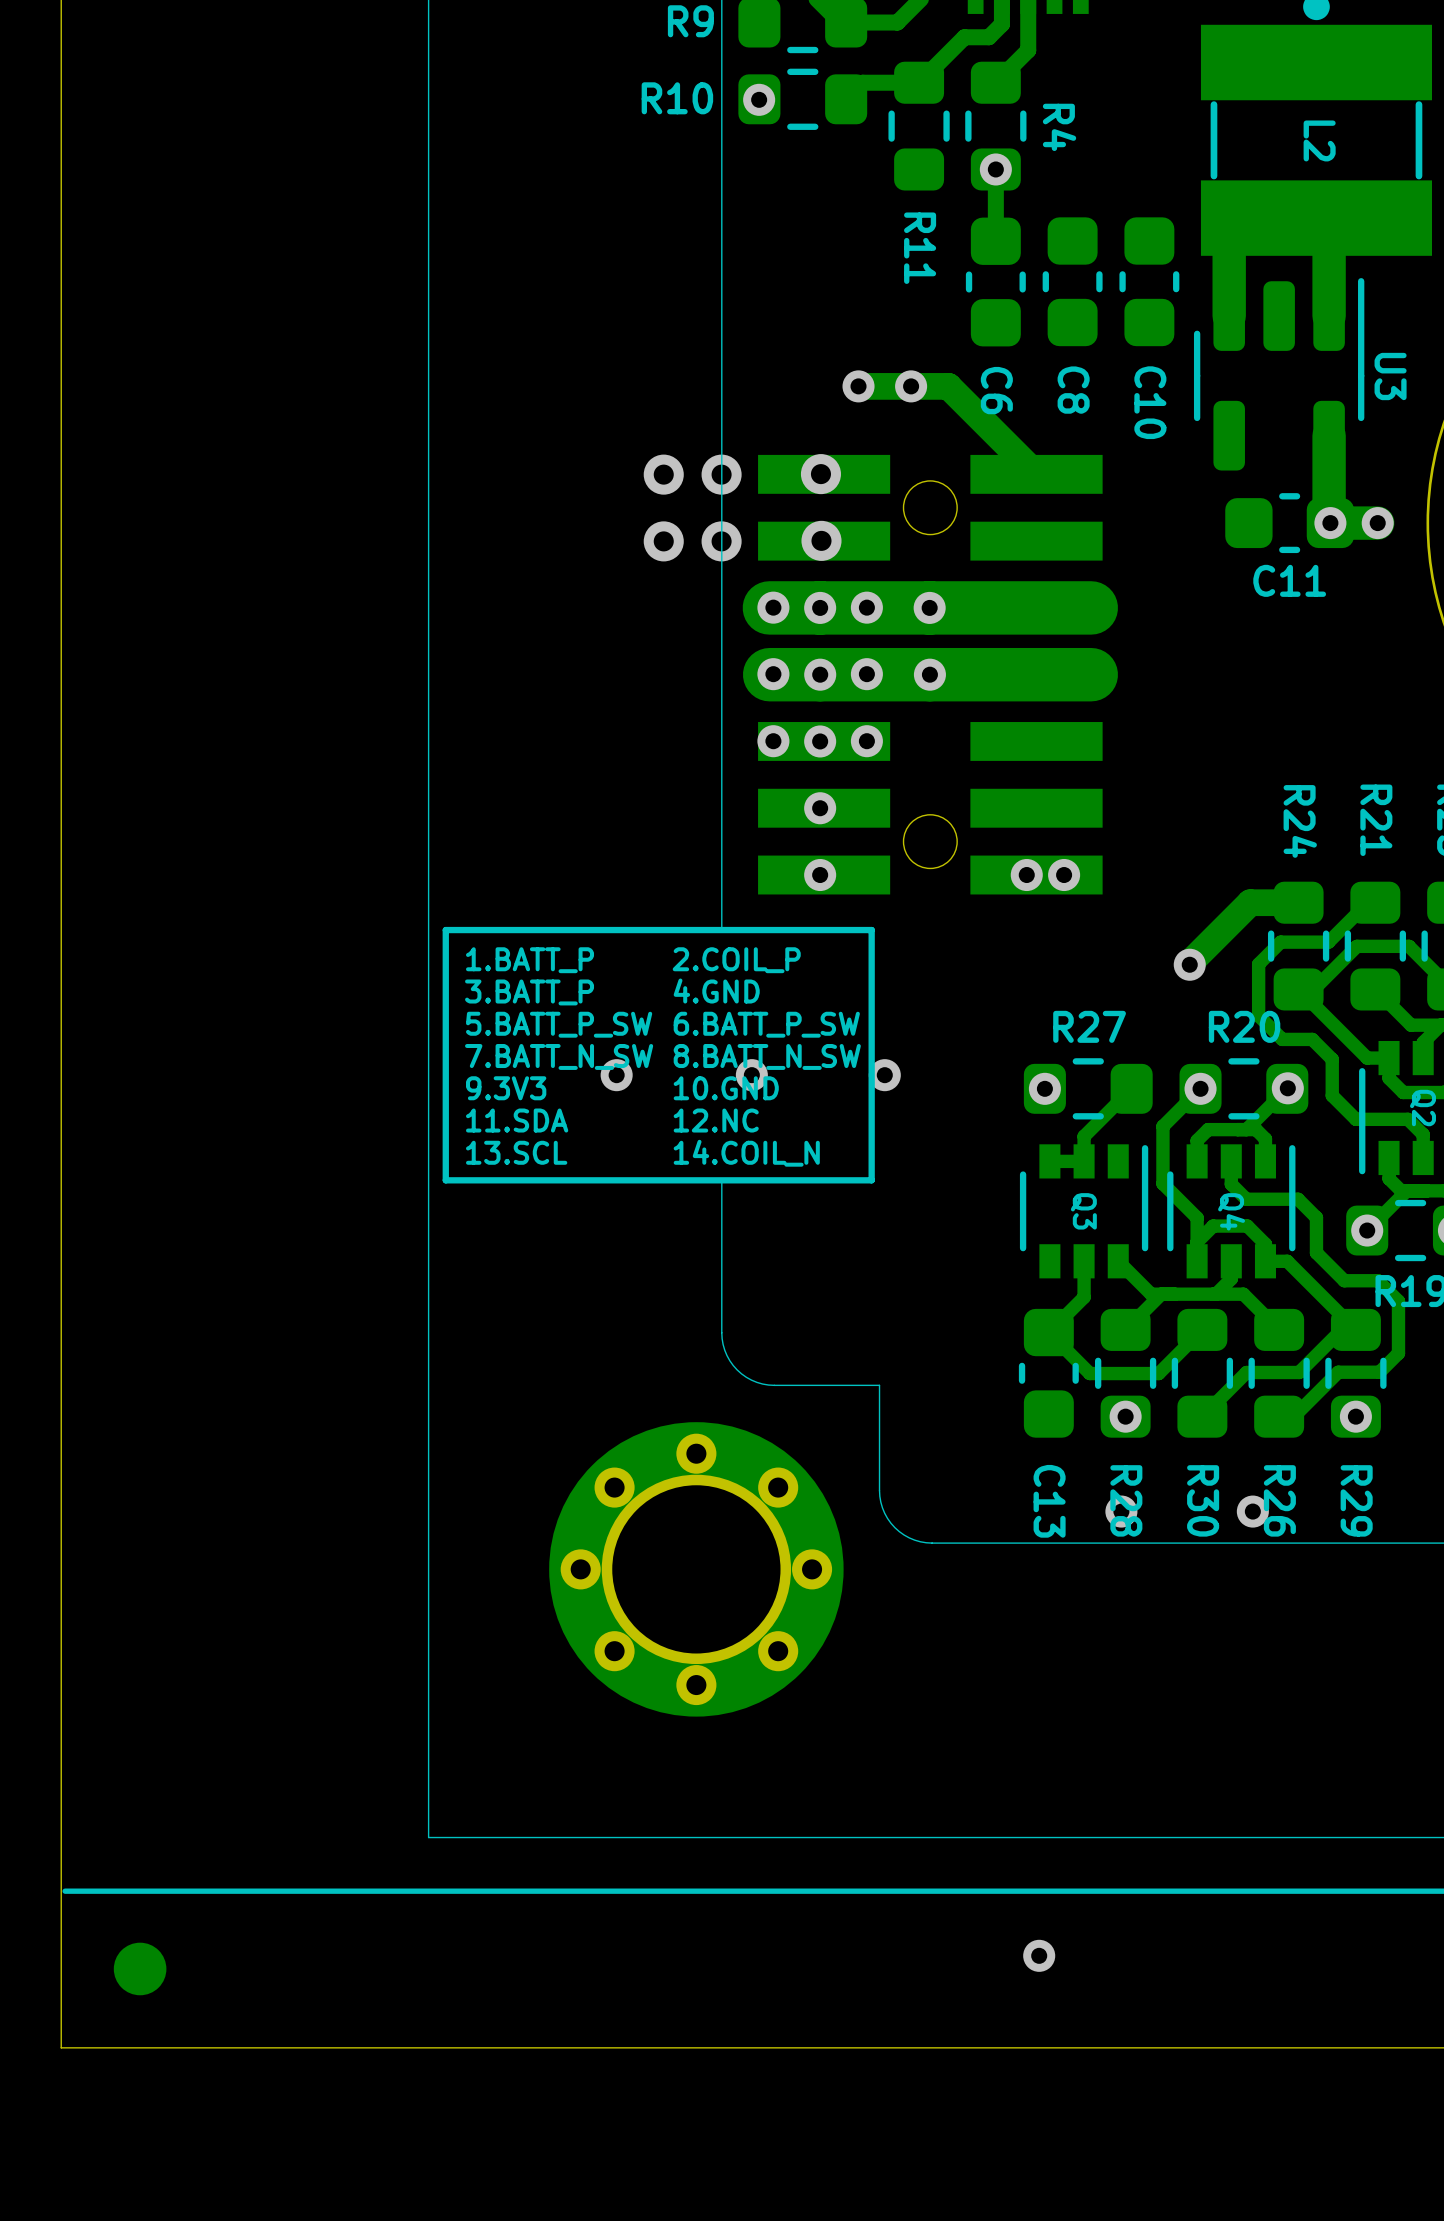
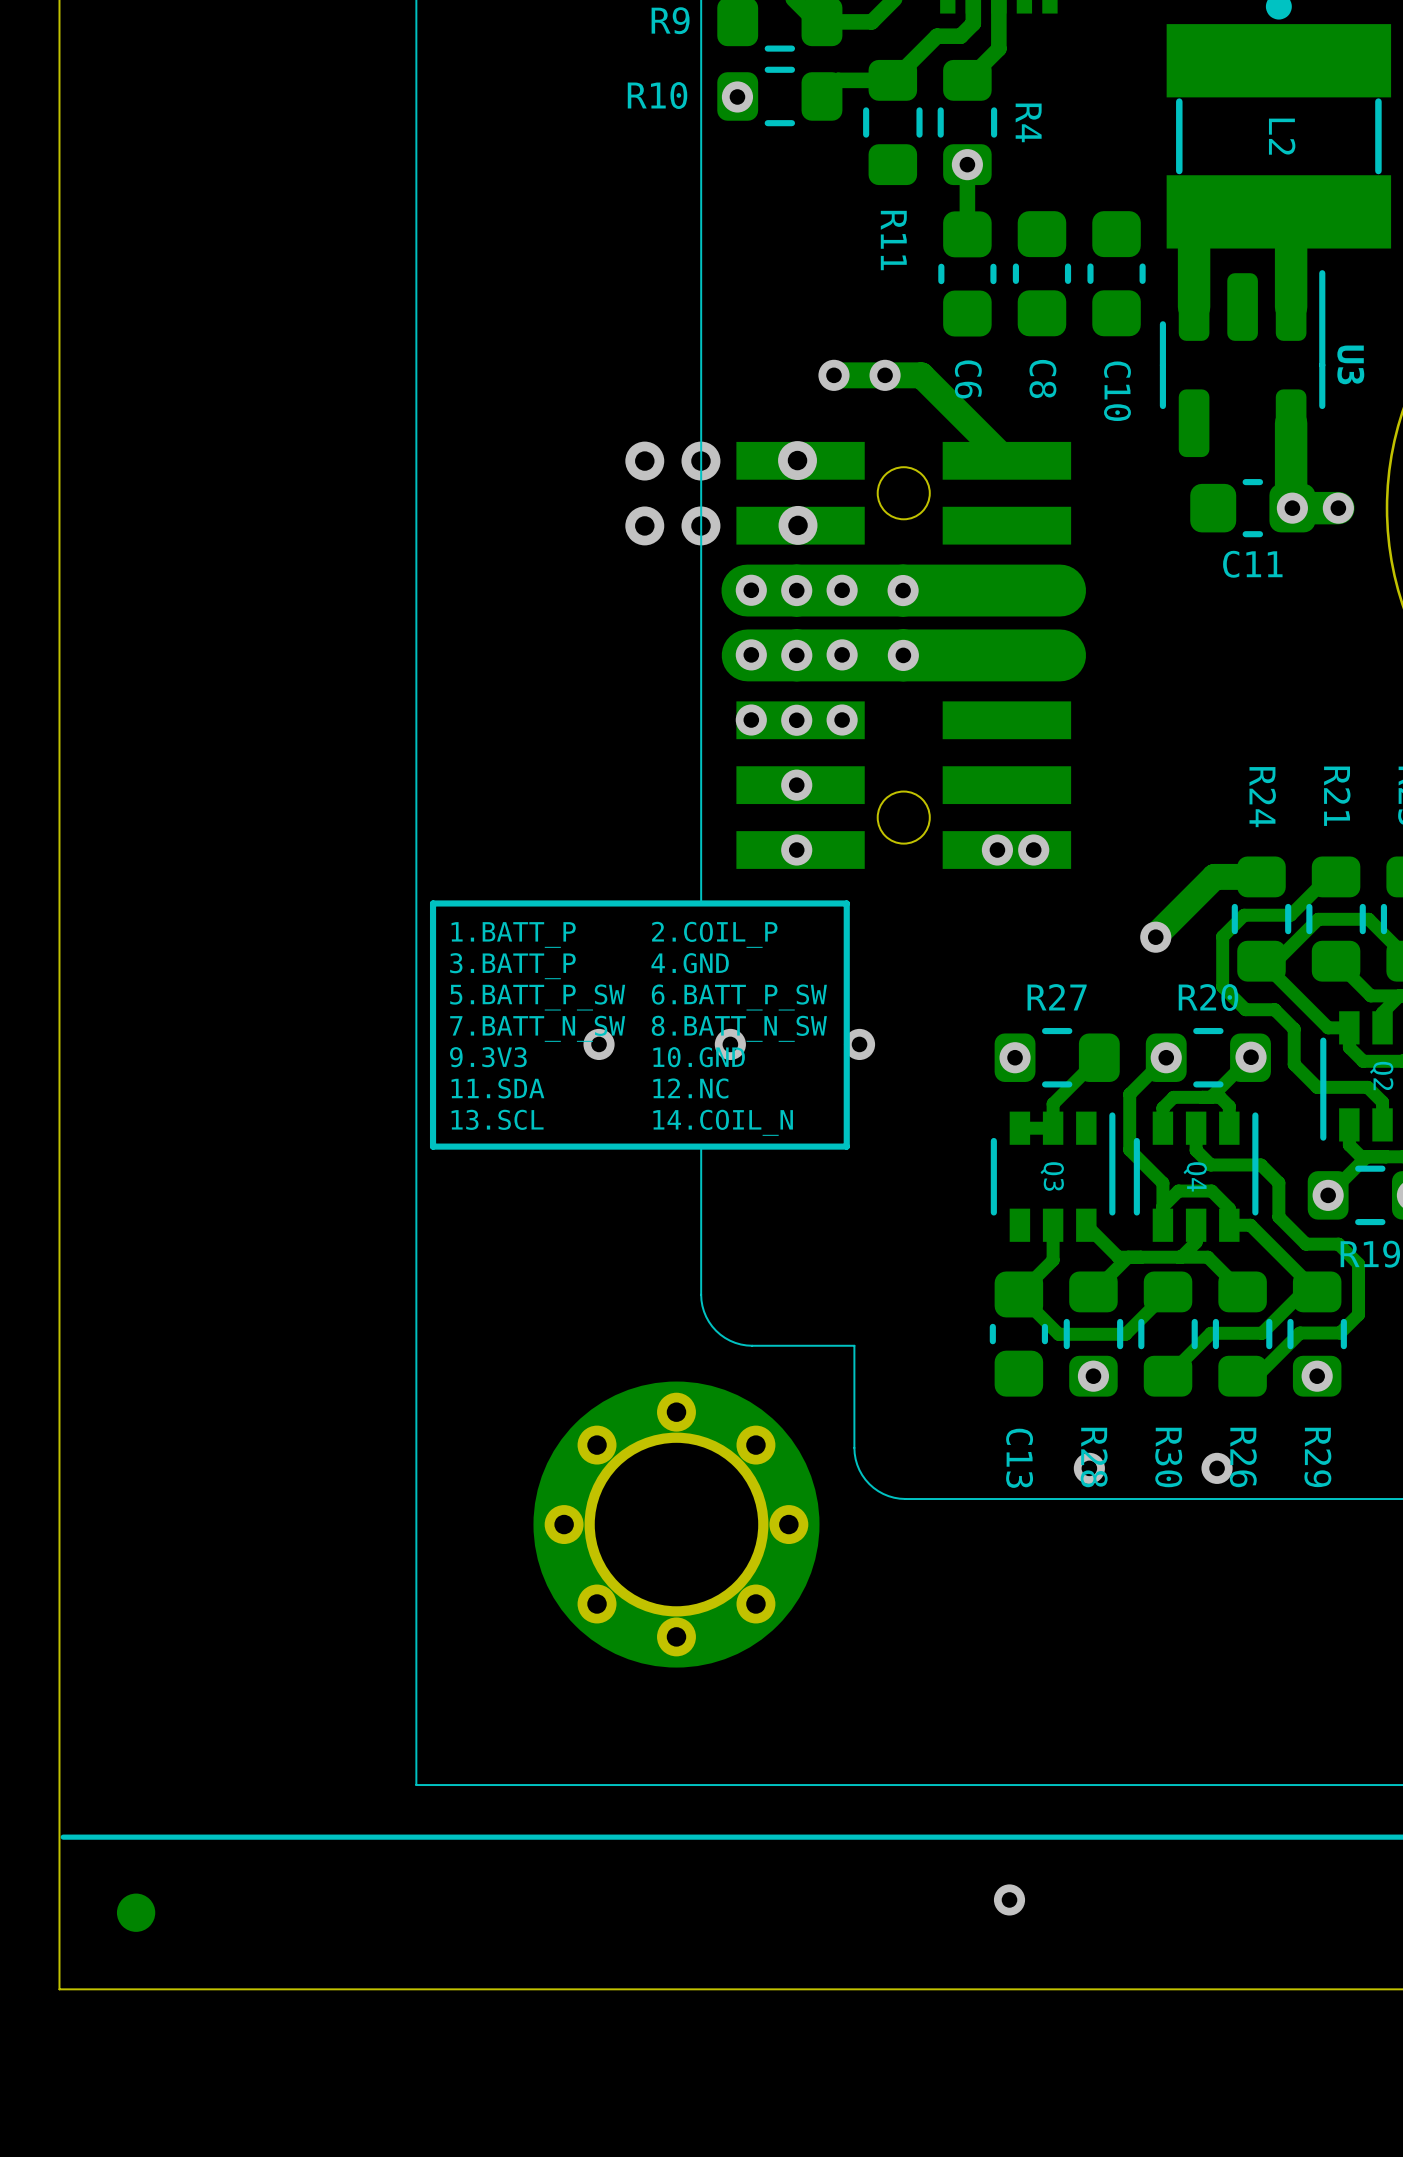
part footprint: [113, 1942, 167, 1996] -> [116, 1893, 156, 1932]

